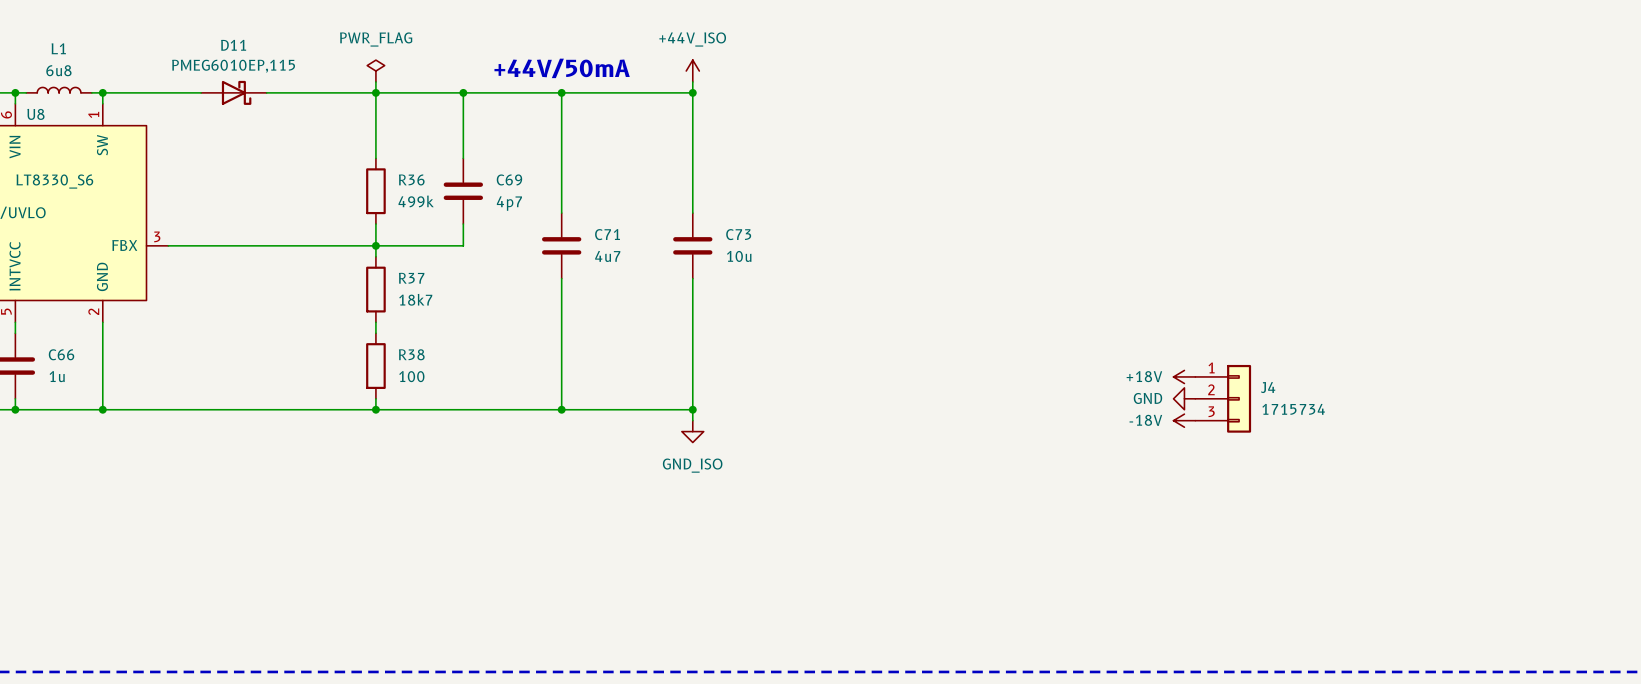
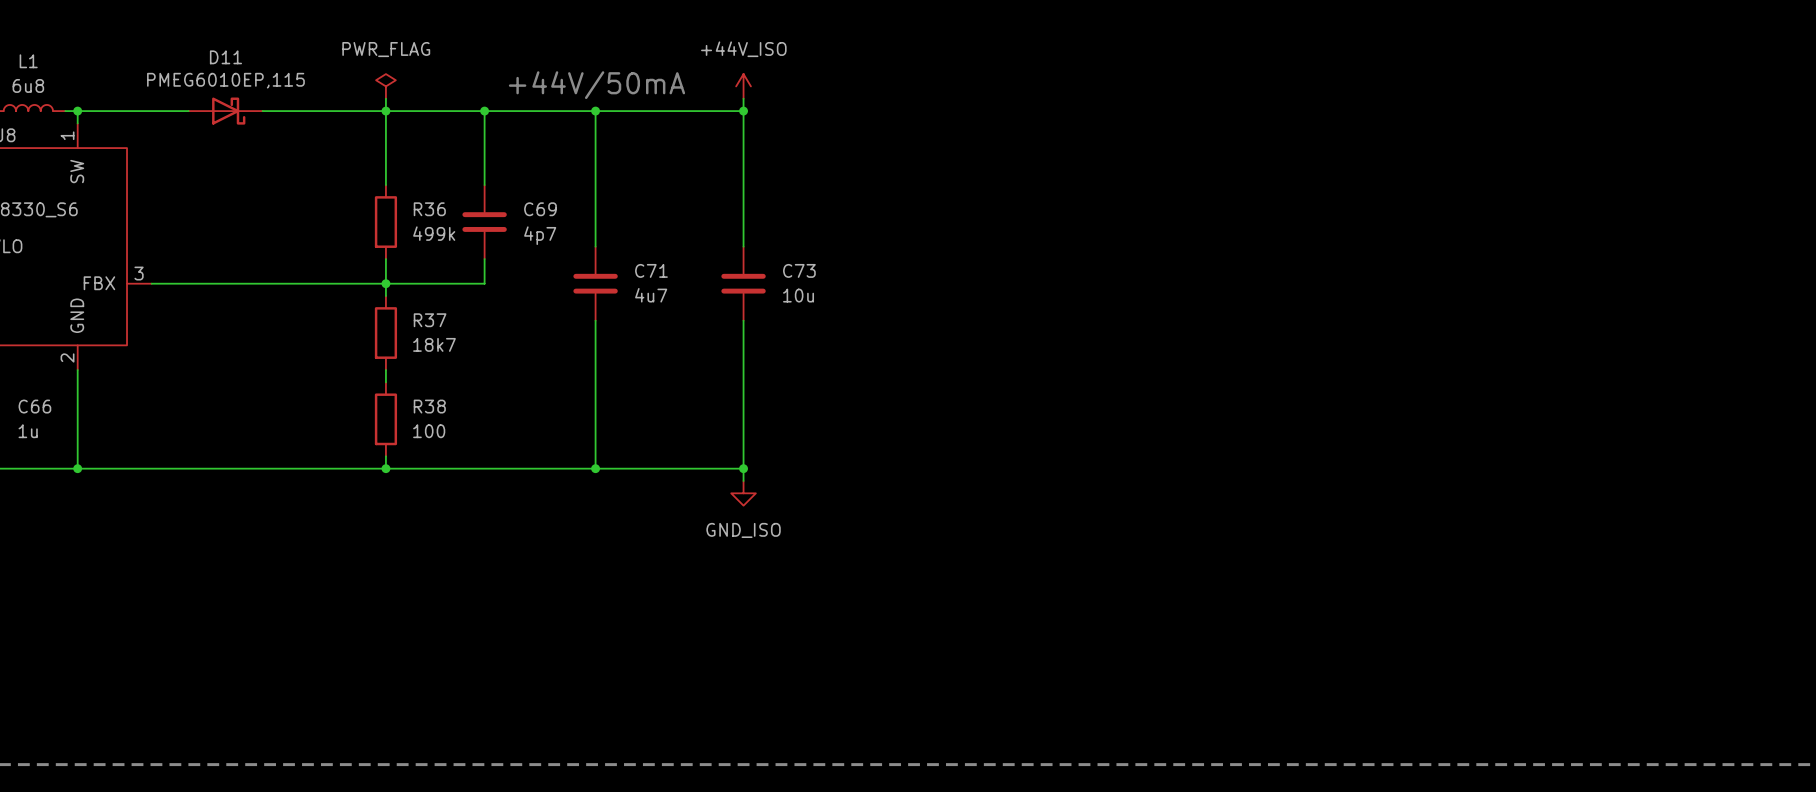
power symbol: +18V (1184, 376) -> none
power symbol: GND (1184, 398) -> none
J4: 1715734 (1223, 398) -> none
power symbol: -18V (1184, 420) -> none

